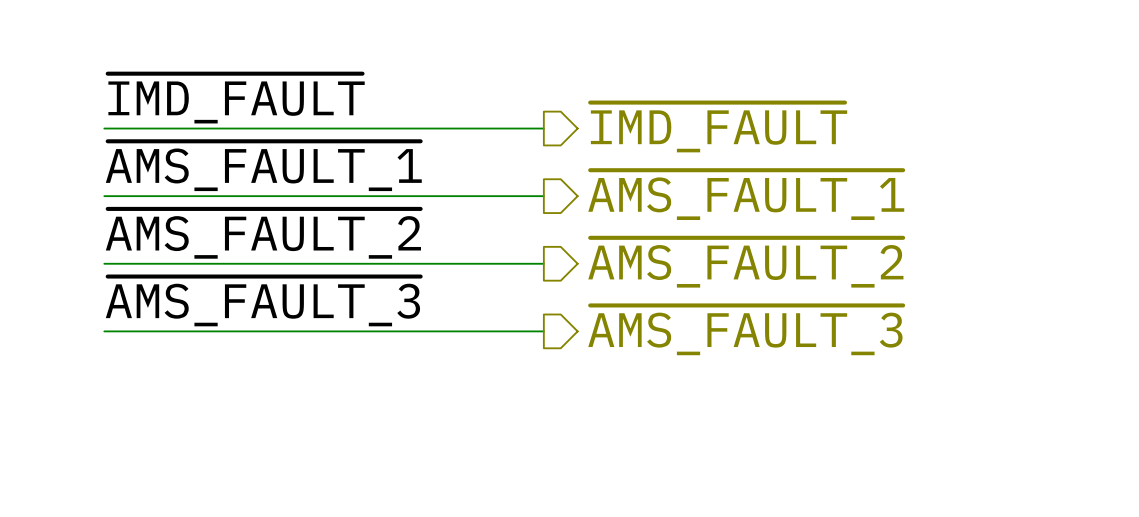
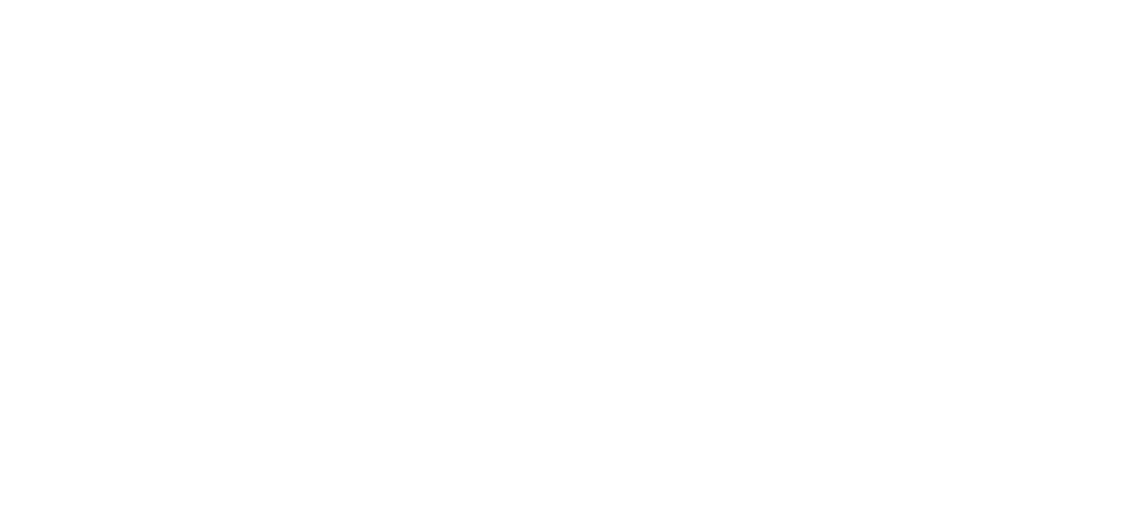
label: ~{IMD_FAULT} (236, 98) -> none
hierarchical label: ~{IMD_FAULT} (718, 127) -> none
wire: (104, 128) (543, 128) -> none
label: ~{AMS_FAULT_1} (263, 166) -> none
hierarchical label: ~{AMS_FAULT_1} (746, 195) -> none
wire: (104, 196) (543, 196) -> none
label: ~{AMS_FAULT_2} (263, 233) -> none
hierarchical label: ~{AMS_FAULT_2} (745, 262) -> none
wire: (104, 263) (543, 263) -> none
label: ~{AMS_FAULT_3} (263, 301) -> none
hierarchical label: ~{AMS_FAULT_3} (745, 330) -> none
wire: (104, 331) (543, 331) -> none

